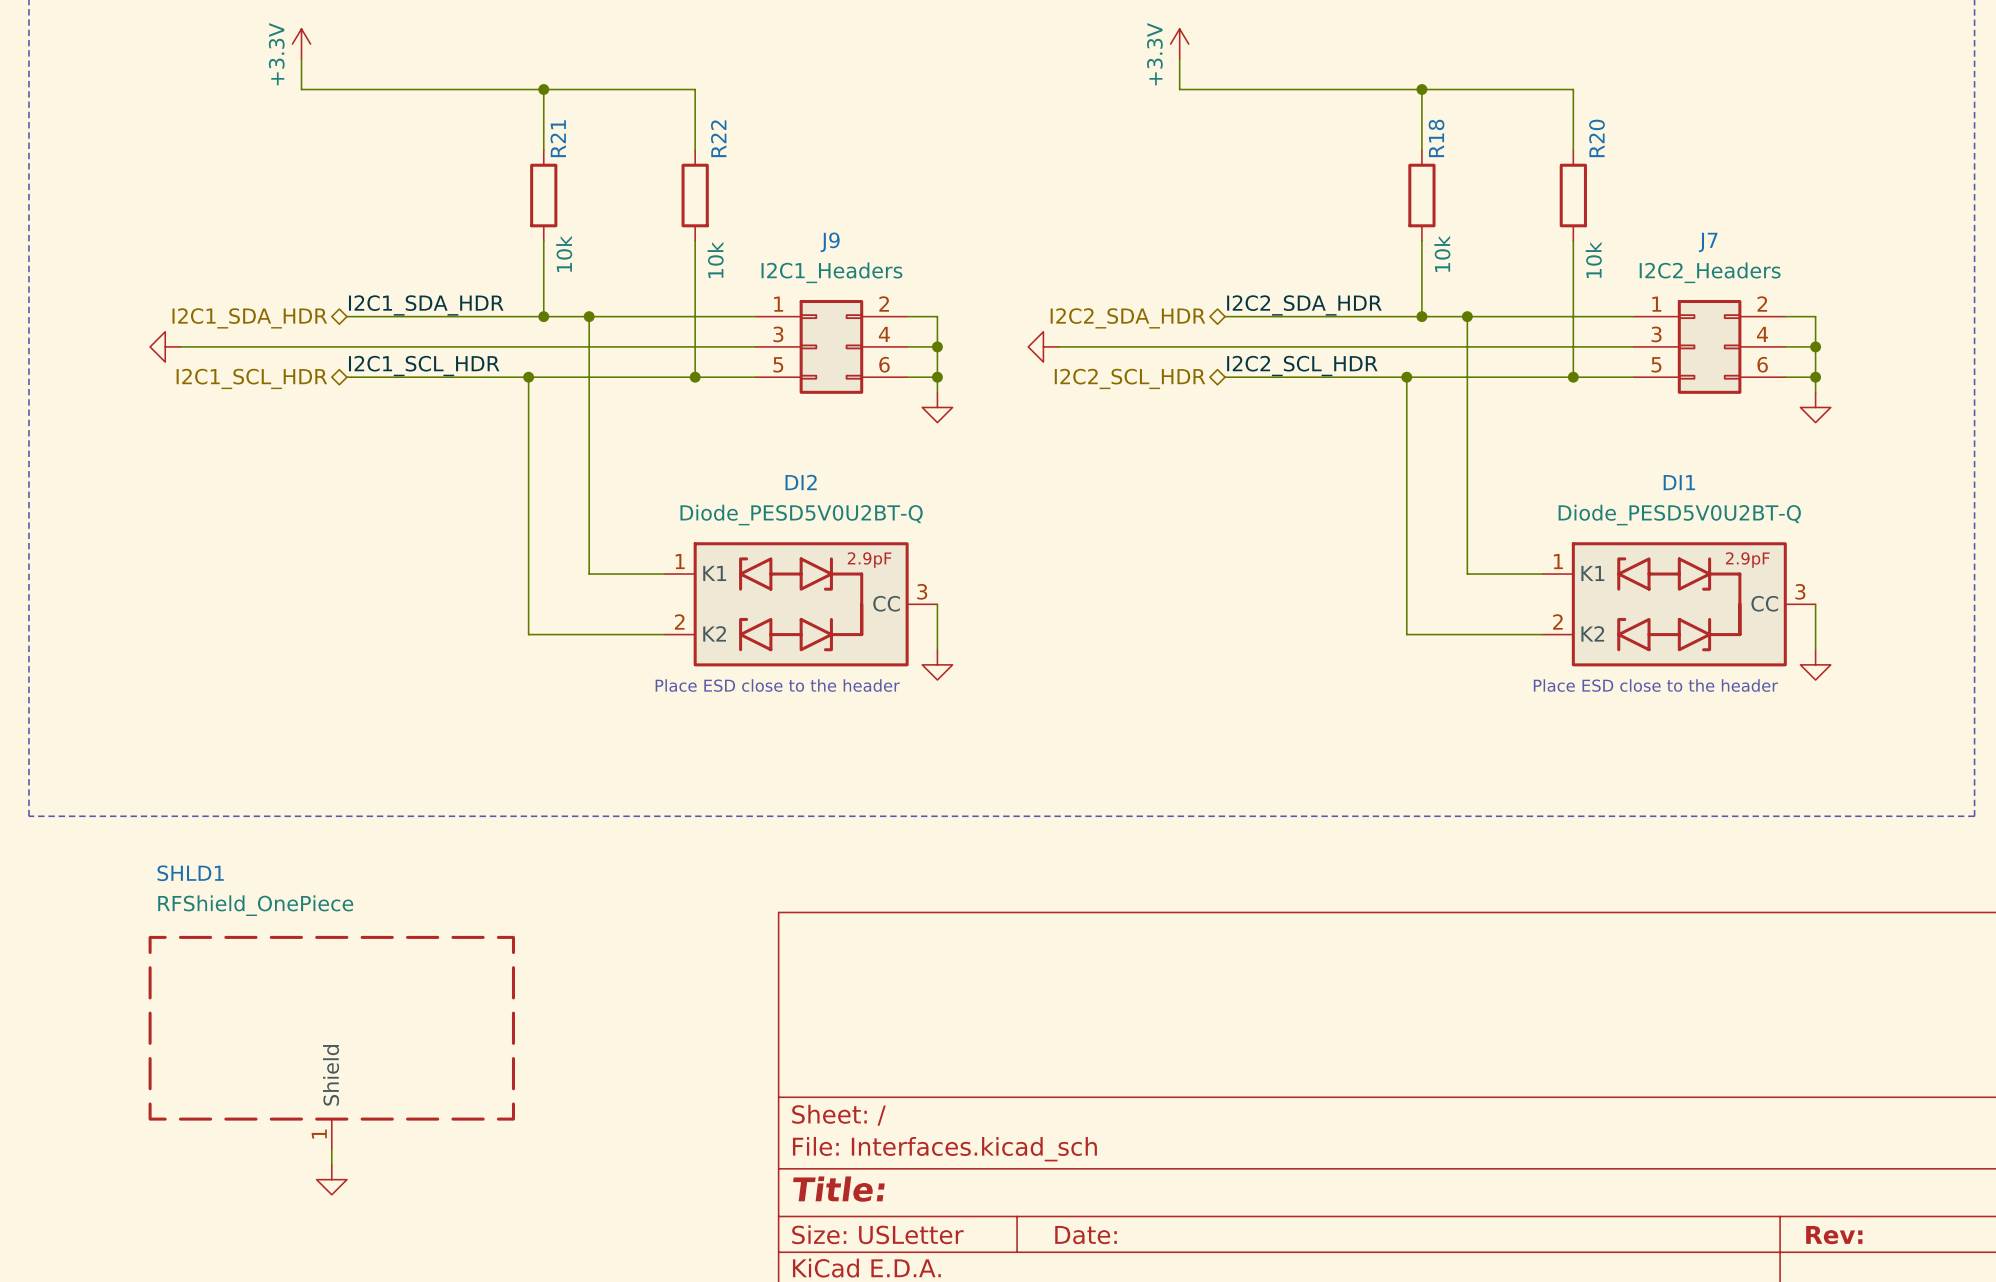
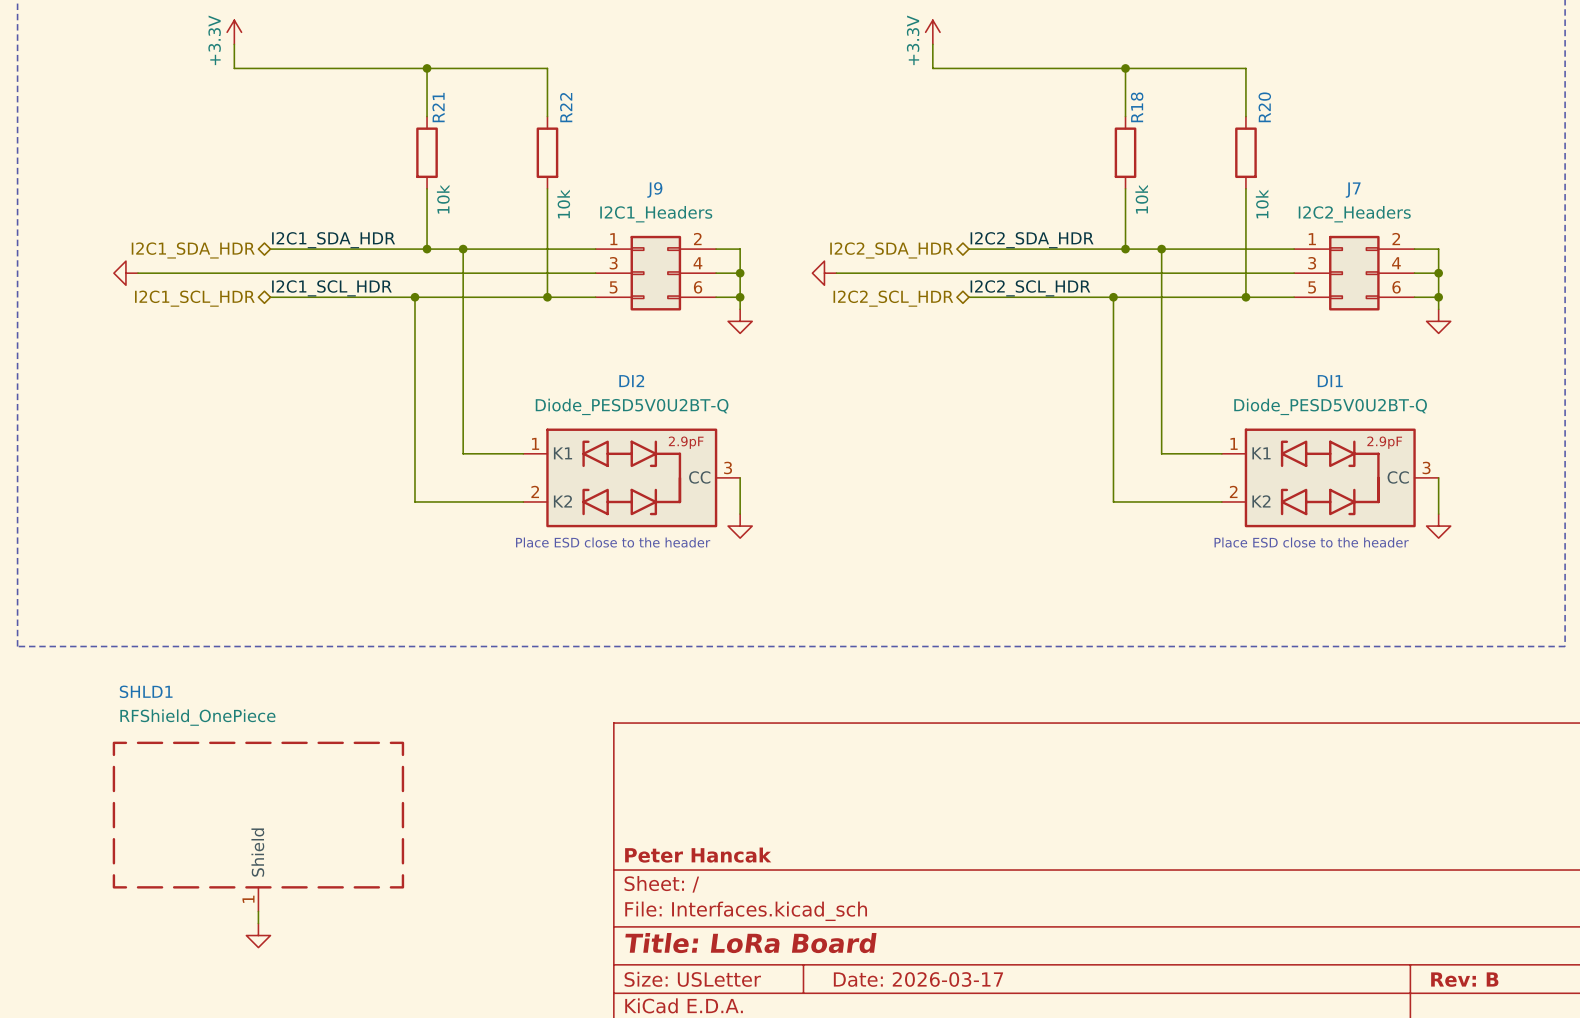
title block: none -> Peter Hancak (698, 855)
title block: Title: (838, 1189) -> Title: LoRa Board (750, 943)
title block: Date: (1086, 1235) -> Date: 2026-03-17 (918, 979)
title block: Rev: (1834, 1235) -> Rev: B (1464, 979)

